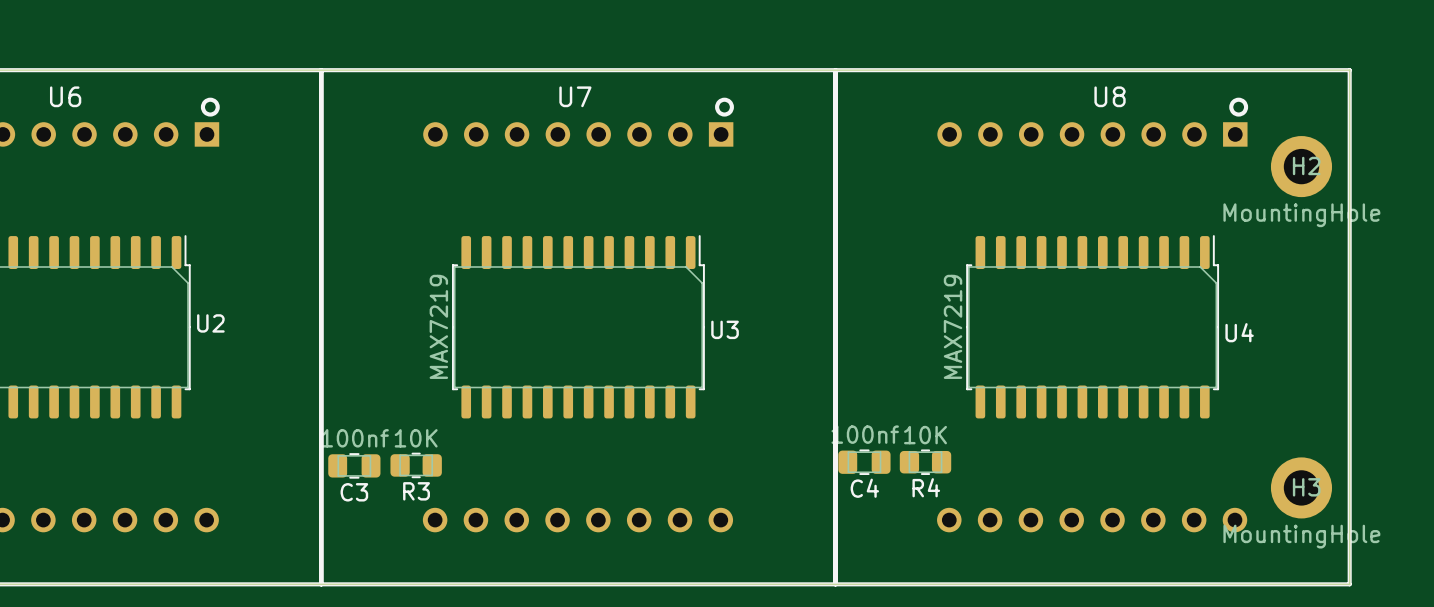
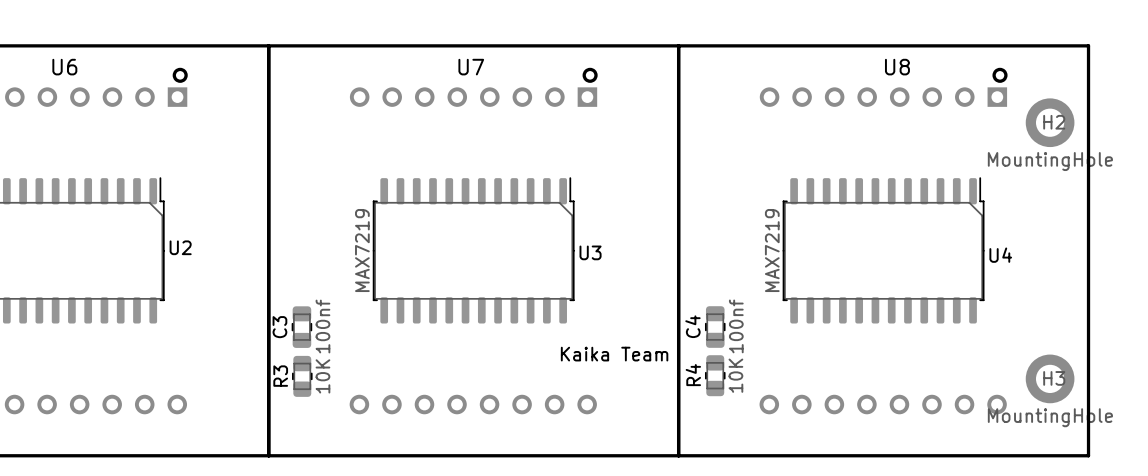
text: none -> Kaika Team (614, 354)
C4 rotation: 0° (864, 462) -> 90° clockwise (715, 327)
C4 position: (864, 462) -> (715, 327)
R4 rotation: 0° (925, 462) -> 90° clockwise (715, 375)
R4 position: (925, 462) -> (715, 375)
C3 rotation: 0° (354, 465) -> 90° clockwise (301, 327)
C3 position: (354, 465) -> (301, 327)
R3 rotation: 0° (416, 465) -> 90° clockwise (302, 376)
R3 position: (416, 465) -> (302, 376)

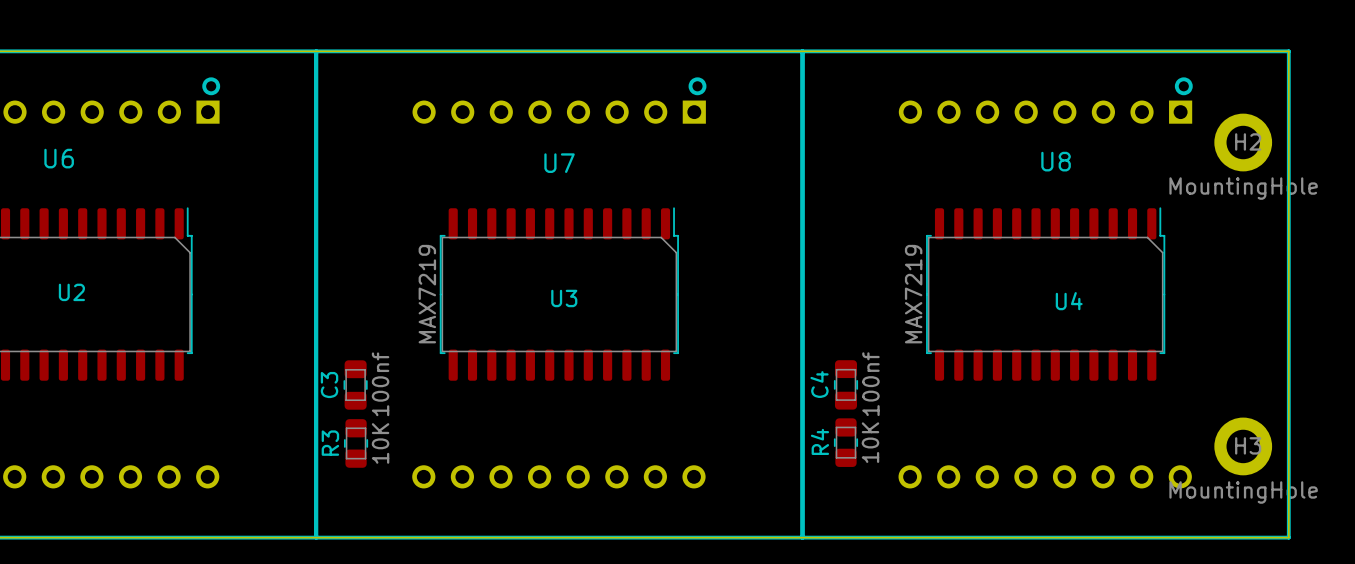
U6 name position: U6 (64, 67) -> U6 (59, 158)
U7 name position: U7 (471, 67) -> U7 (559, 163)
U8 name position: U8 (897, 67) -> U8 (1056, 161)
U2 name position: U2 (180, 247) -> U2 (71, 292)
U3 name position: U3 (590, 252) -> U3 (564, 298)
U4 name position: U4 (1000, 255) -> U4 (1069, 301)
text: Kaika Team (614, 354) -> none

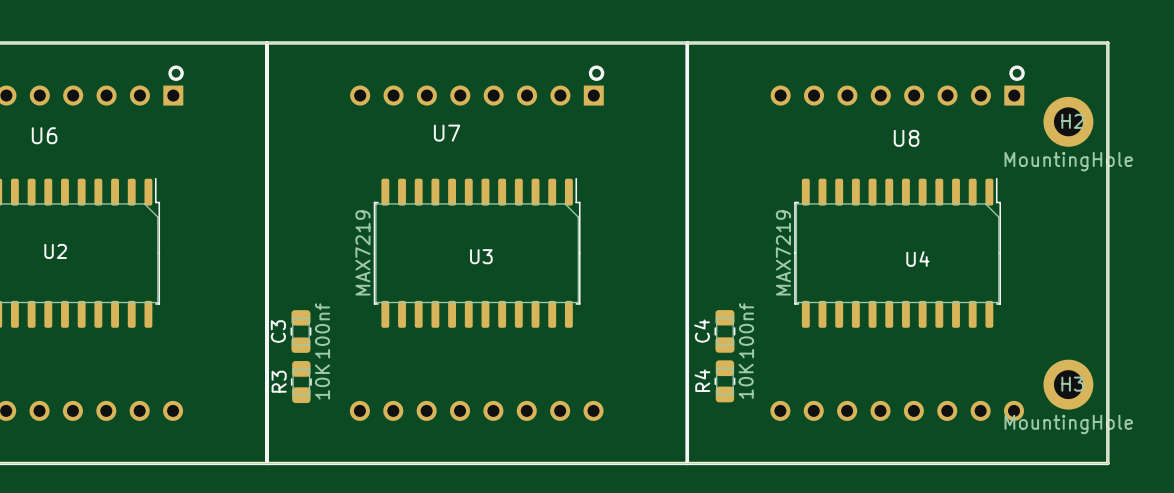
U7 name position: U7 (559, 163) -> U7 (447, 133)

